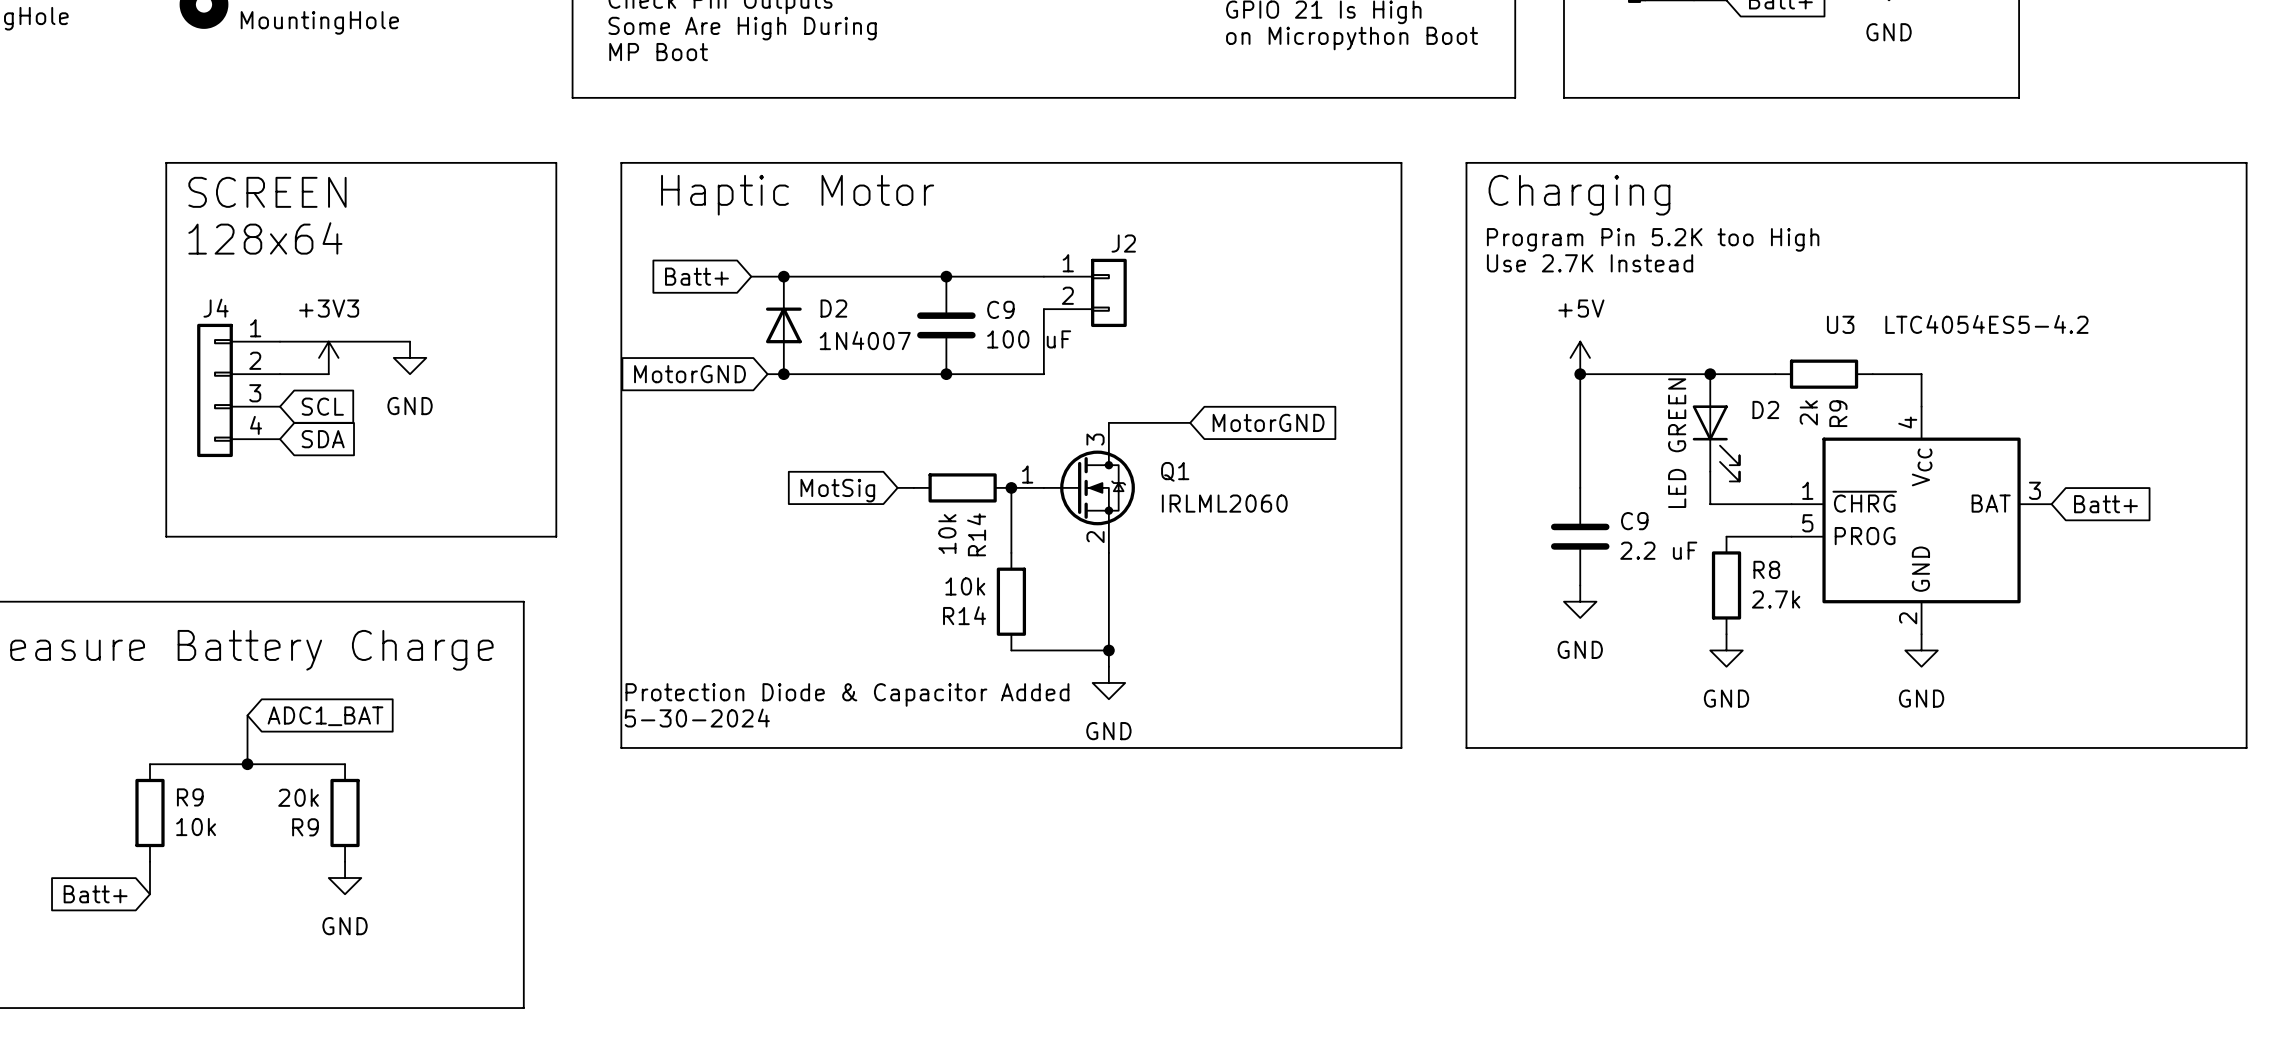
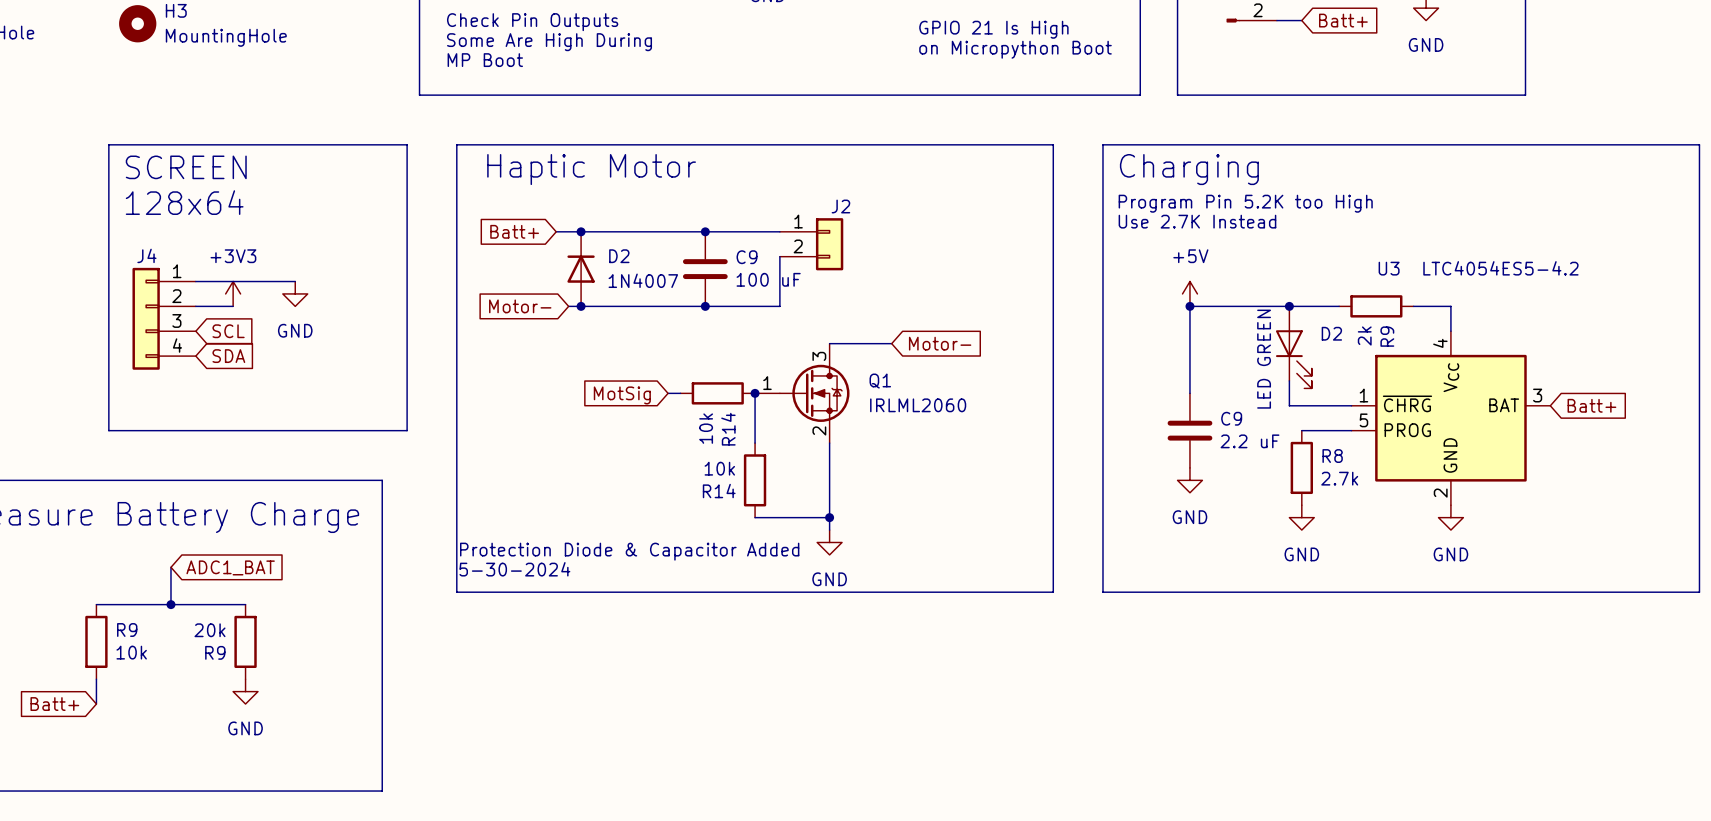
global label: MotorGND (689, 374) -> Motor- (520, 306)
global label: MotorGND (1268, 422) -> Motor- (940, 343)

